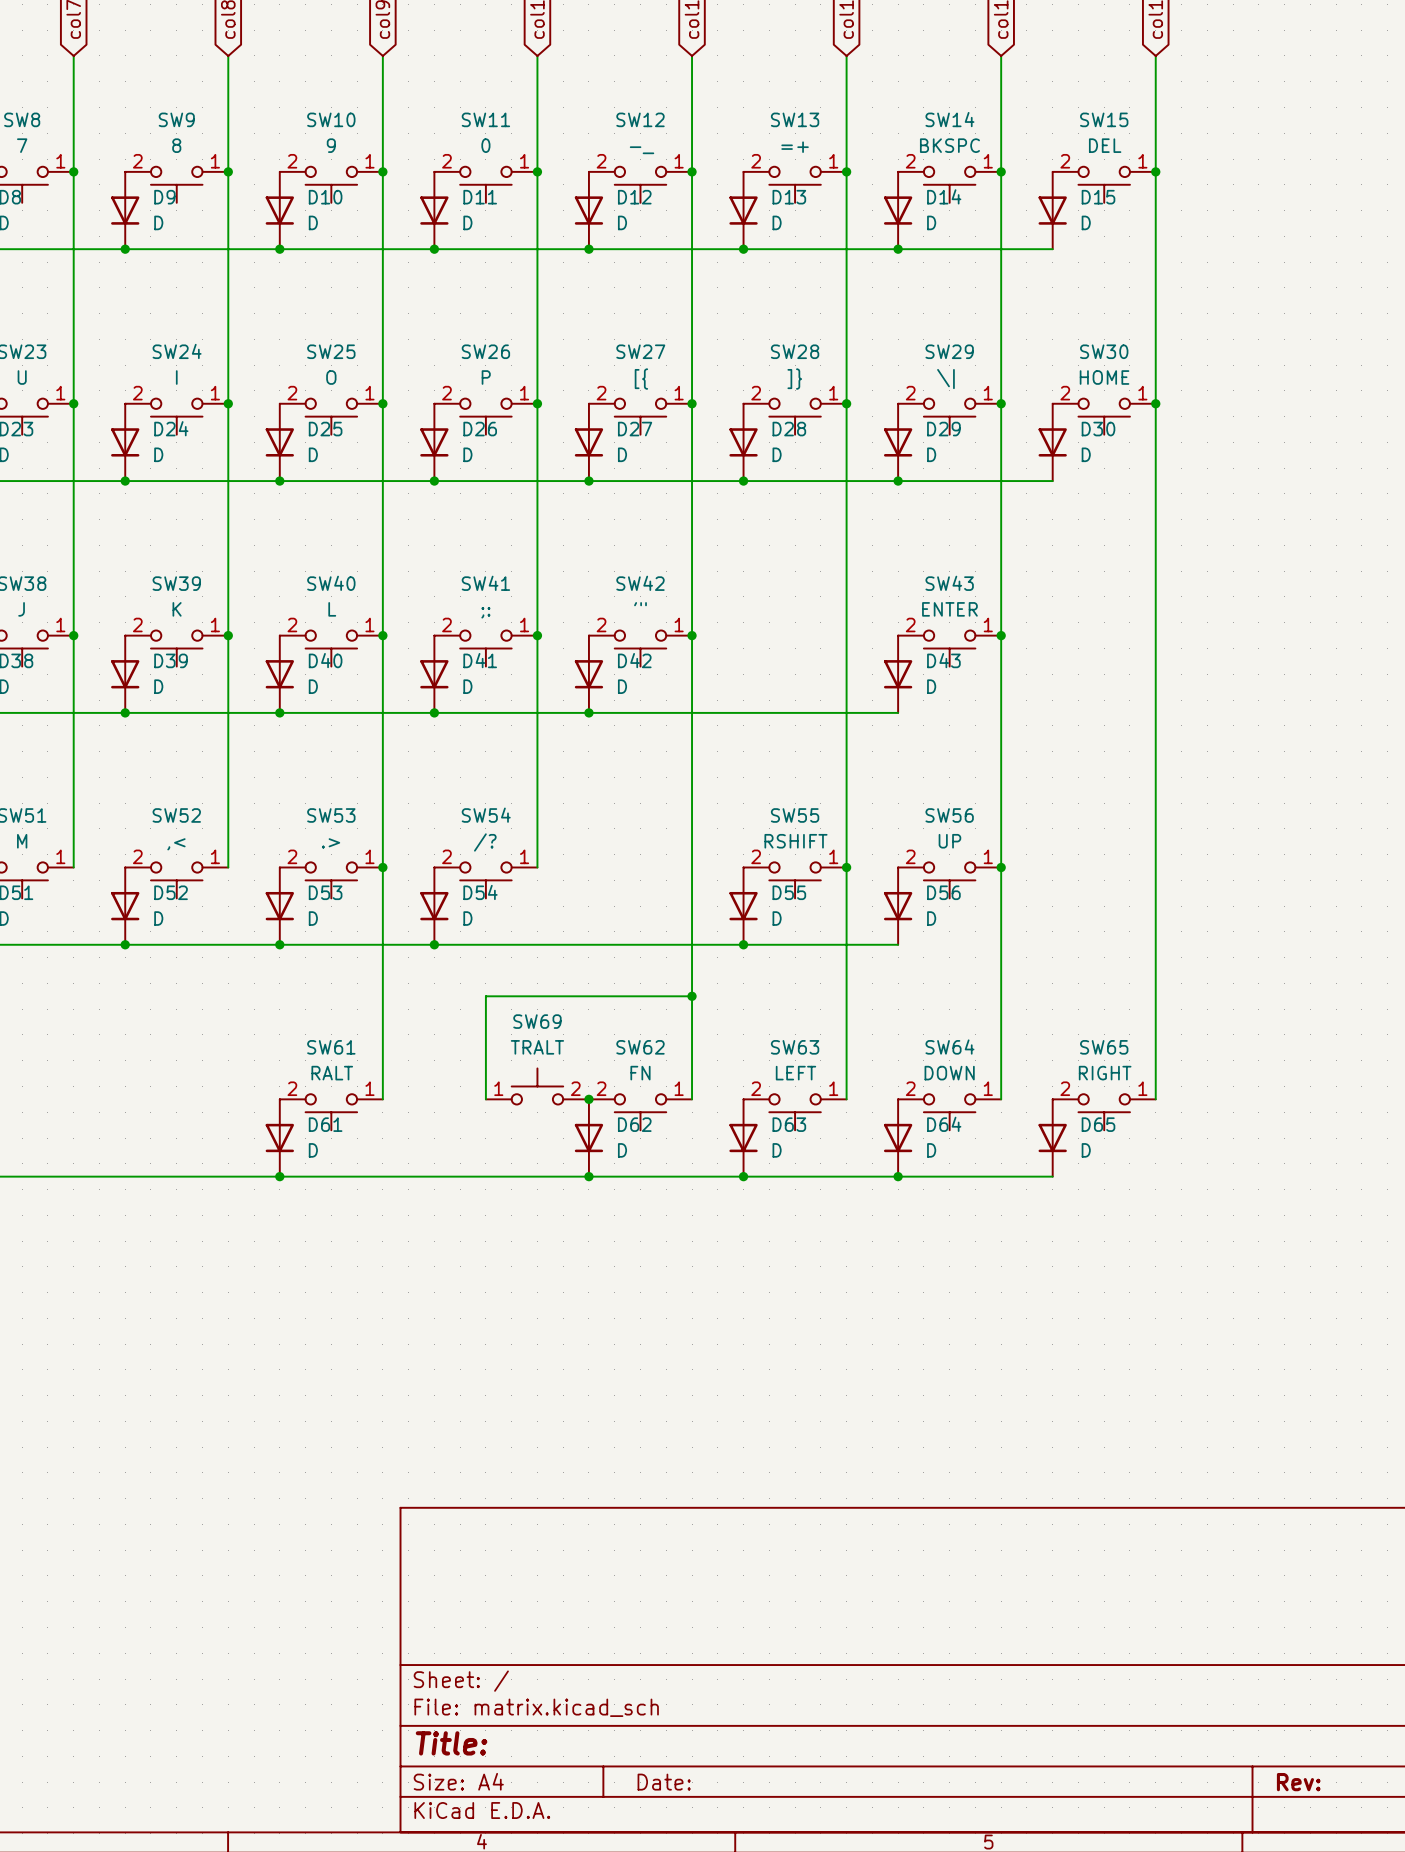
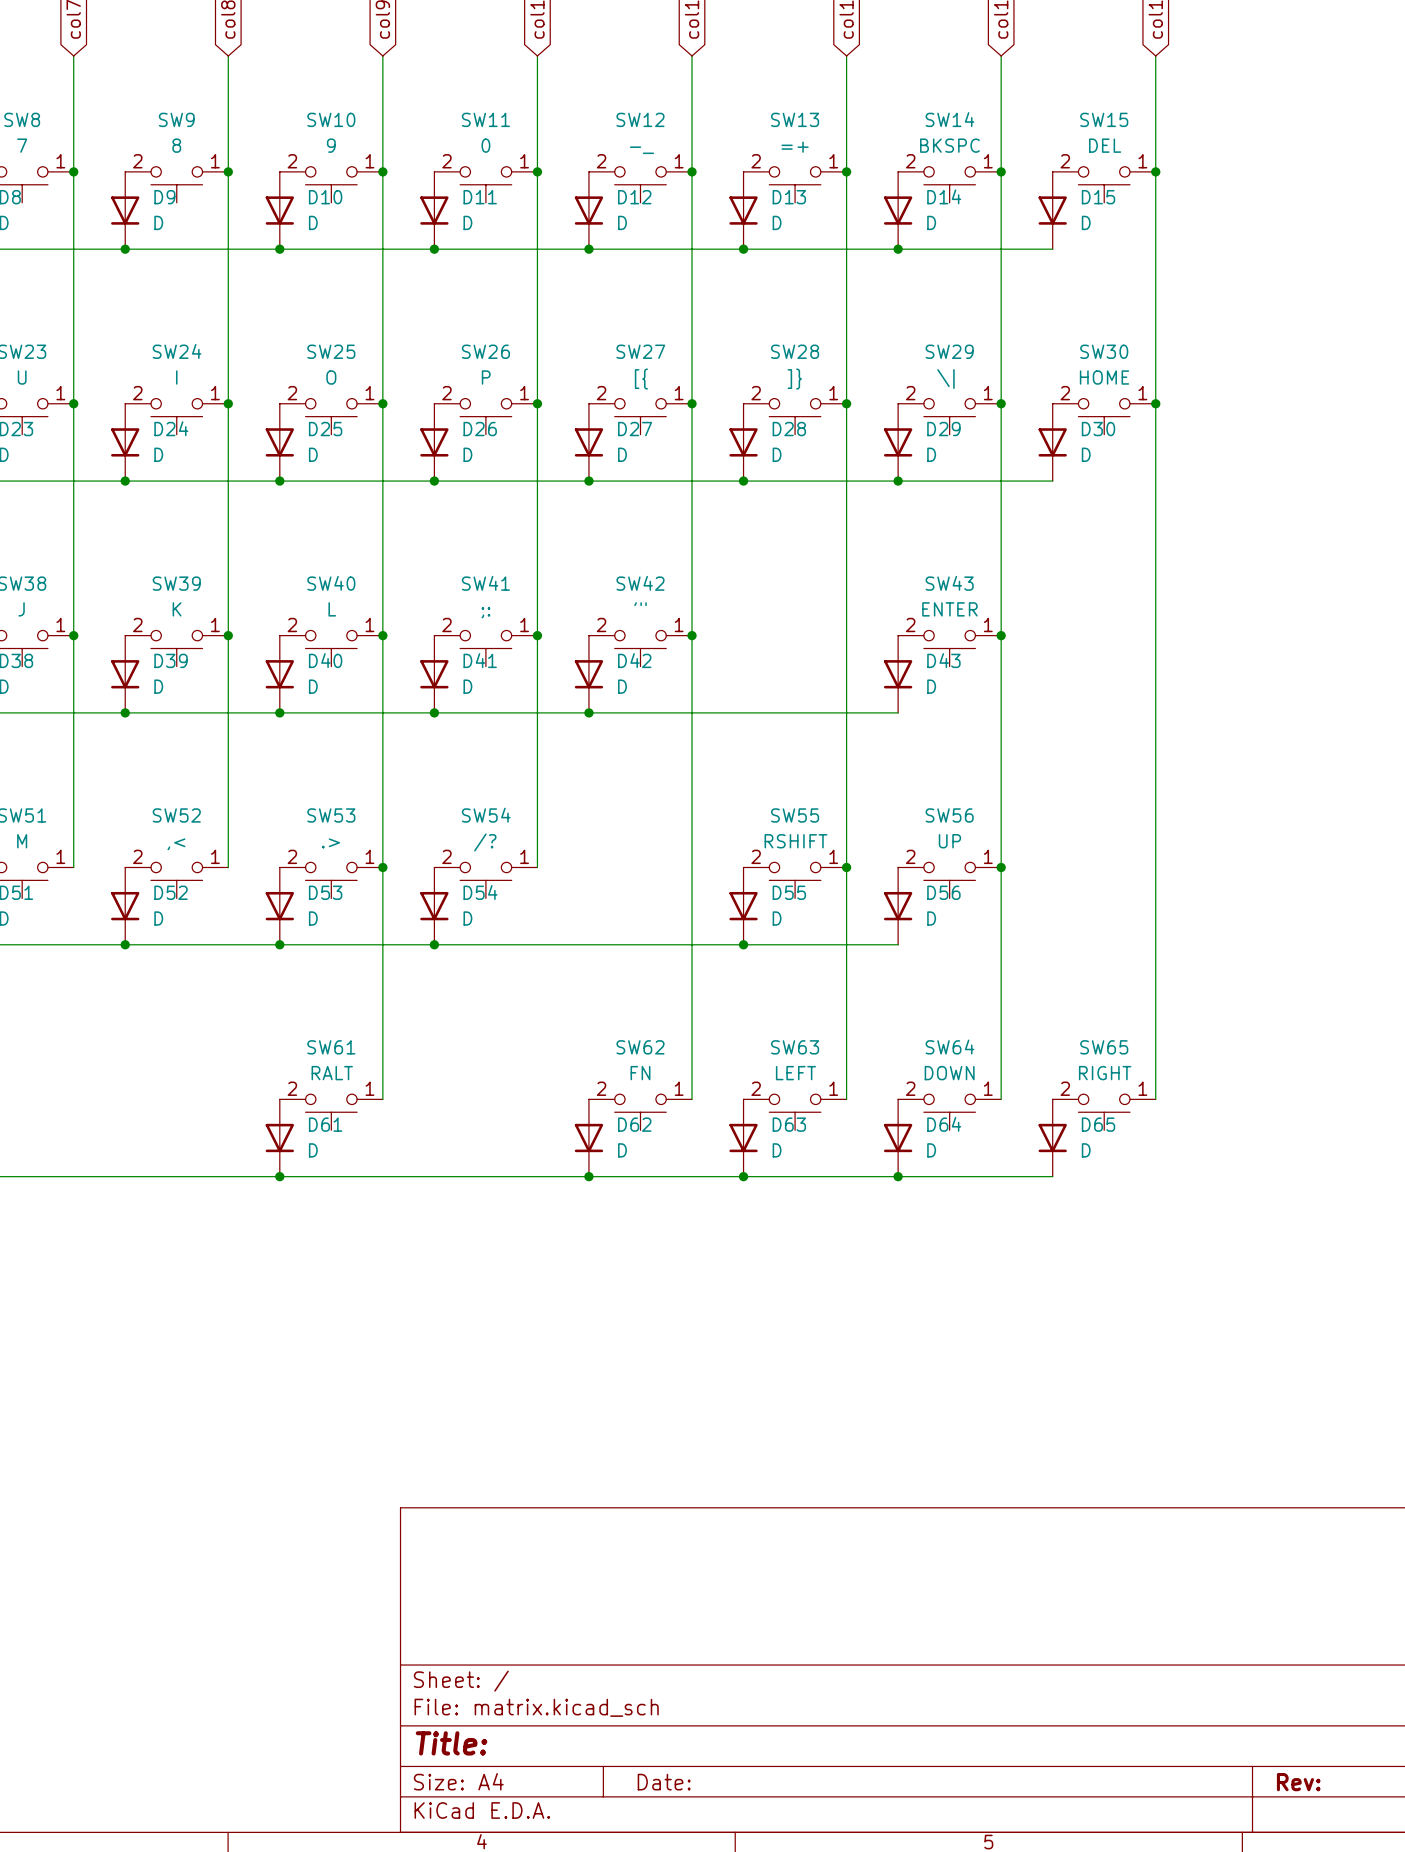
wire: (692, 996) (485, 996) (485, 1099) -> none
junction: (692, 996) -> none
SW69: TRALT (537, 1086) -> none
junction: (588, 1099) -> none

